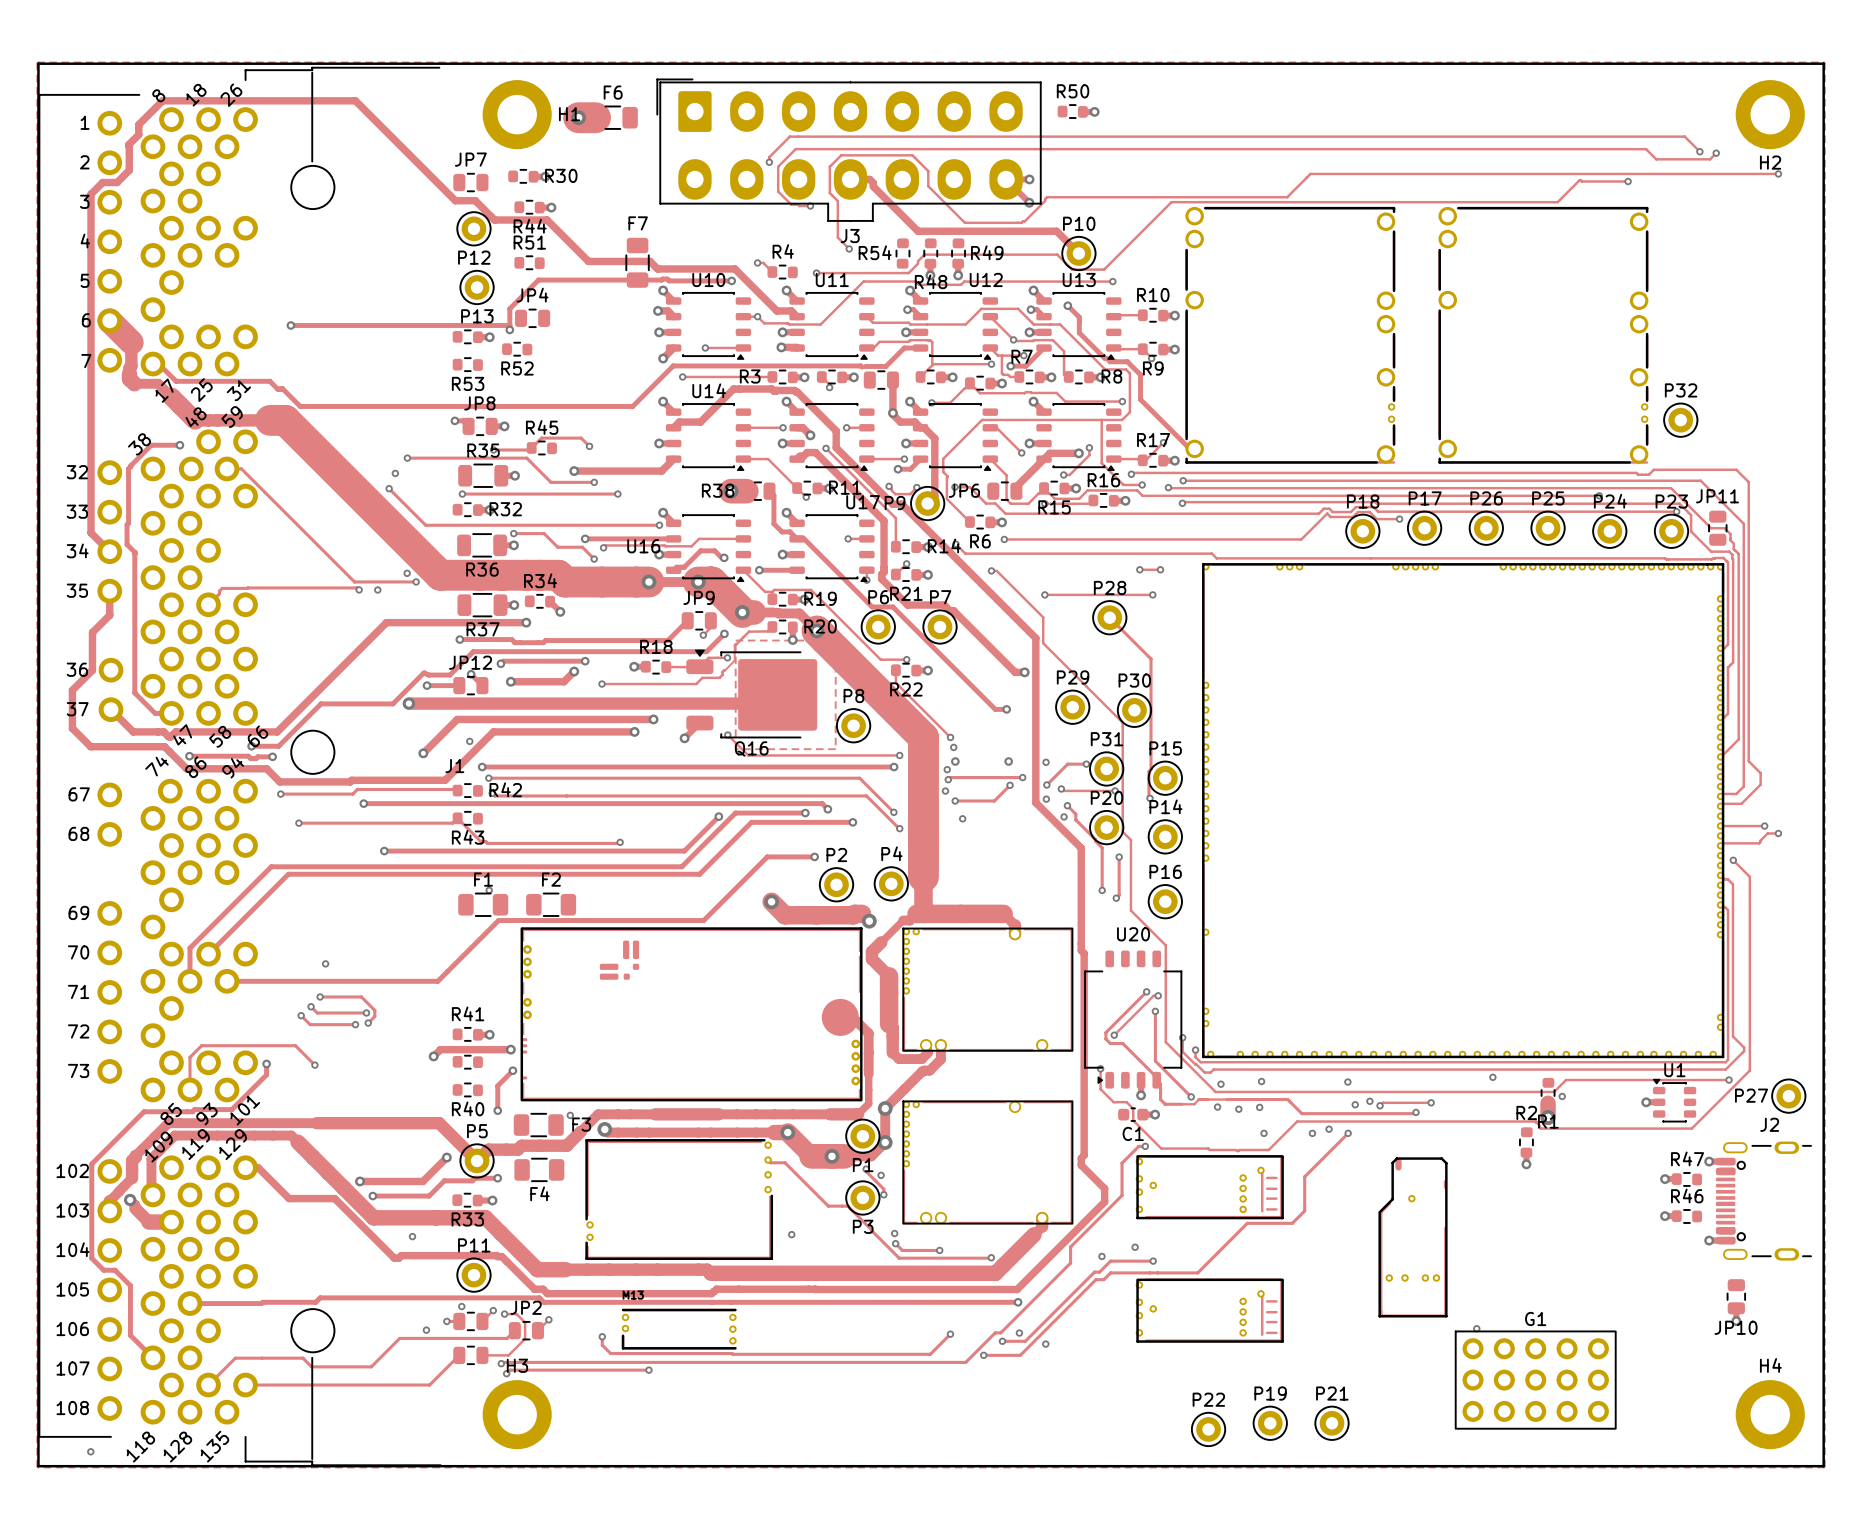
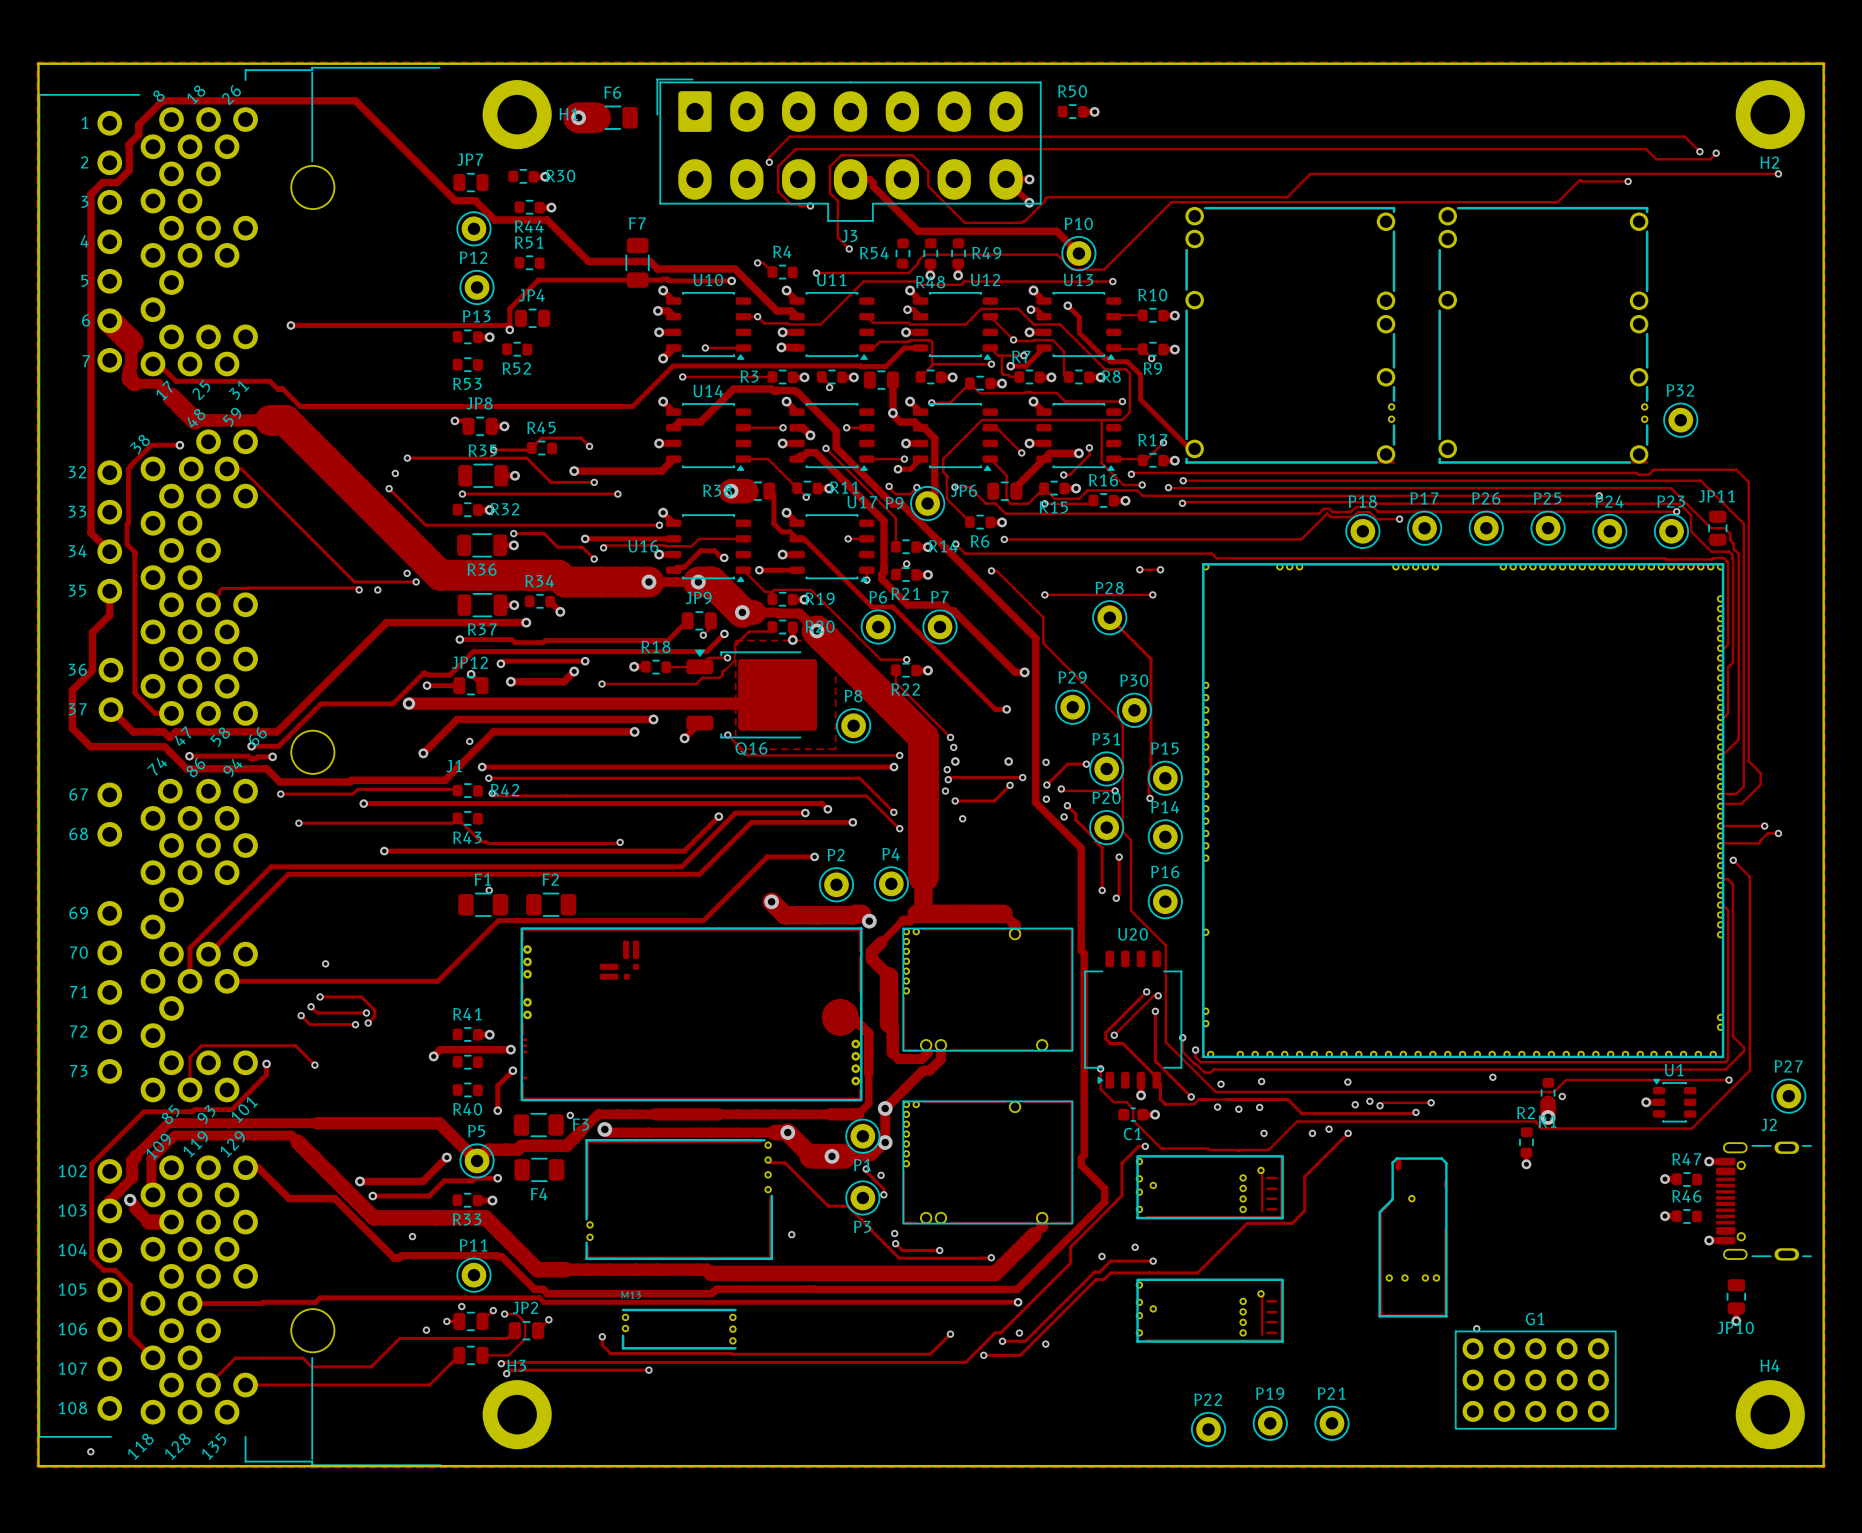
P27 name position: P27 (1751, 1095) -> P27 (1788, 1066)

